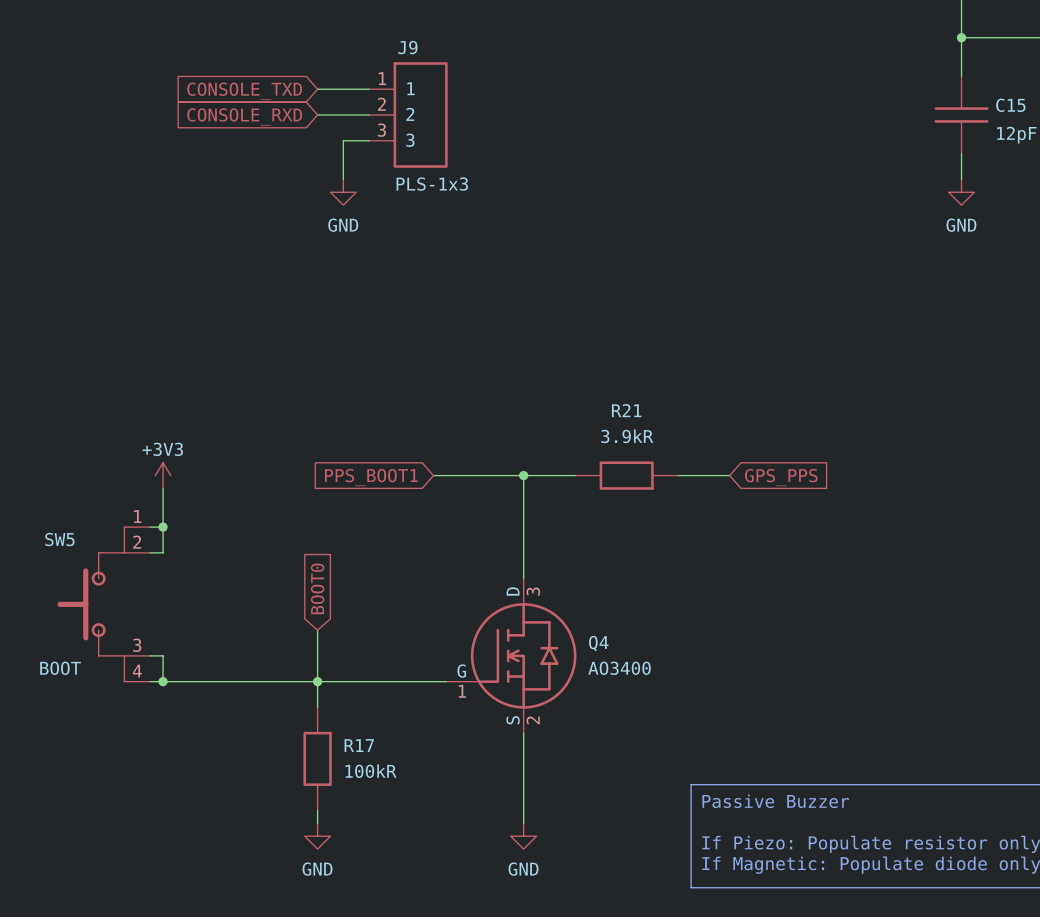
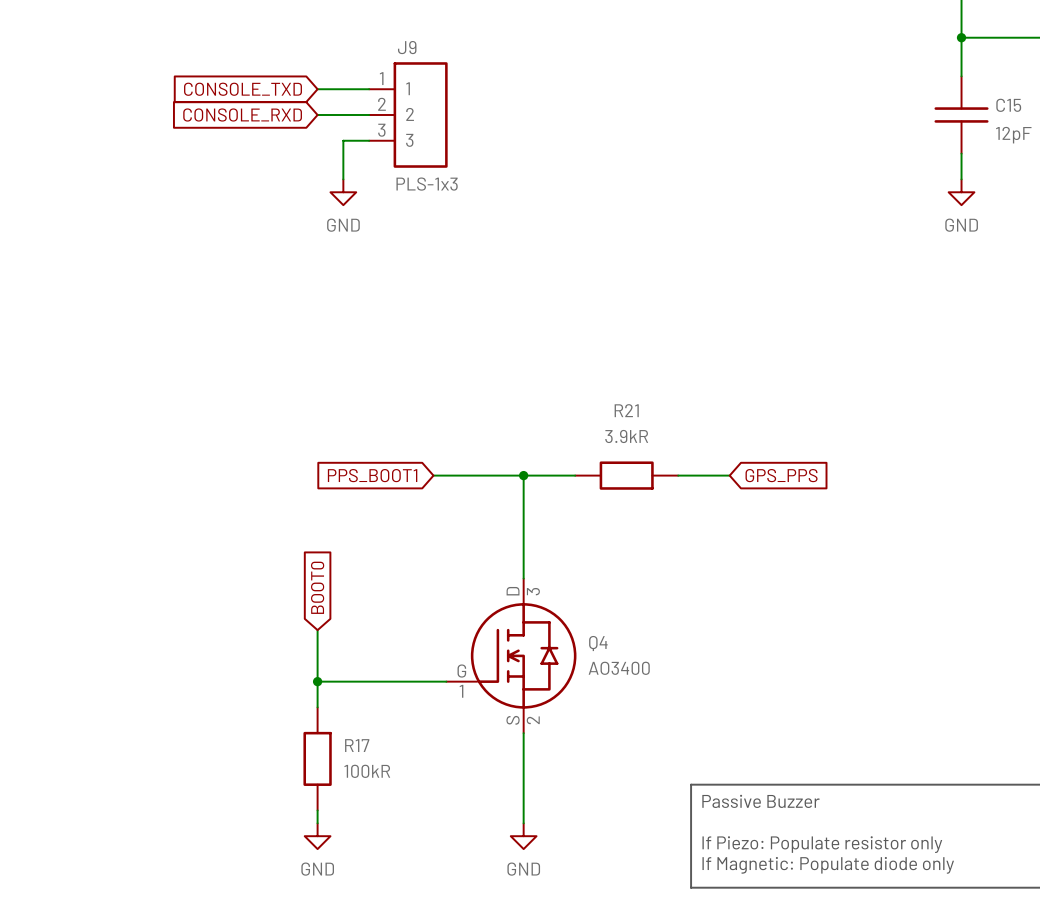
power symbol: +3V3 (163, 475) -> none
wire: (163, 488) (163, 552) (150, 552) -> none
wire: (150, 527) (163, 527) -> none
junction: (163, 527) -> none
SW5: (103, 604) -> none
wire: (150, 655) (163, 655) (163, 681) -> none
wire: (150, 681) (317, 681) -> none
junction: (163, 681) -> none

